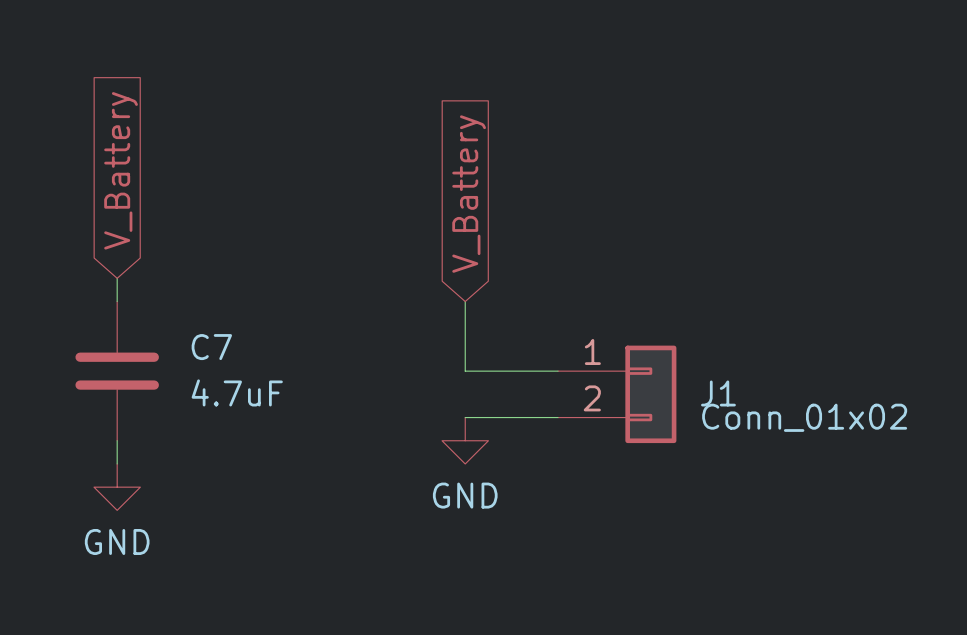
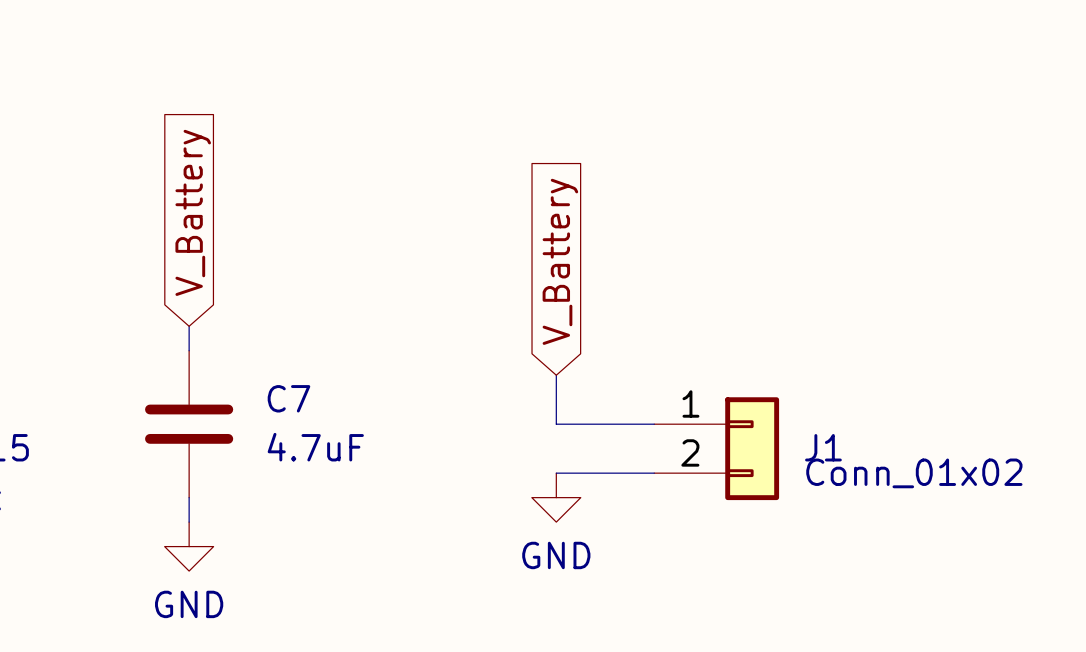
global label position: V_Battery (469, 194) -> V_Battery (560, 261)
wire: (465, 301) (465, 324) -> none

